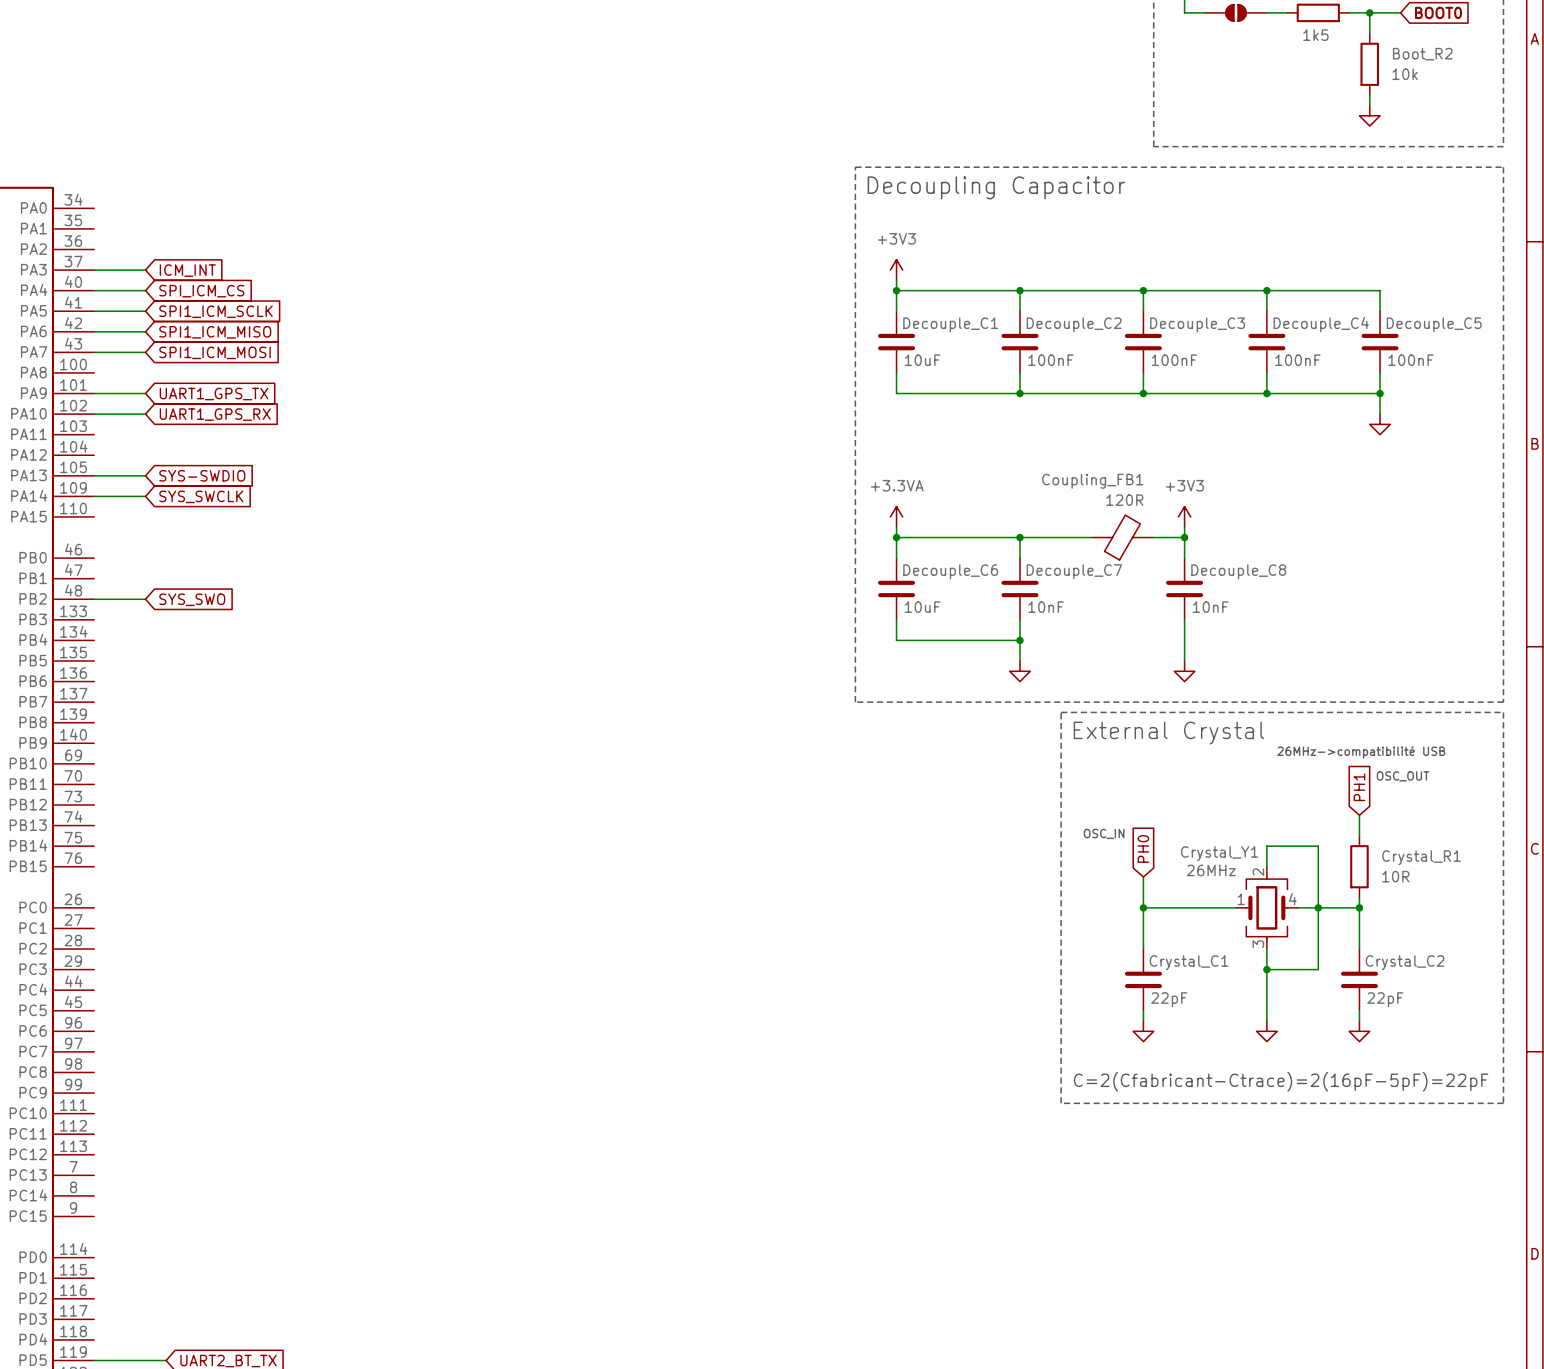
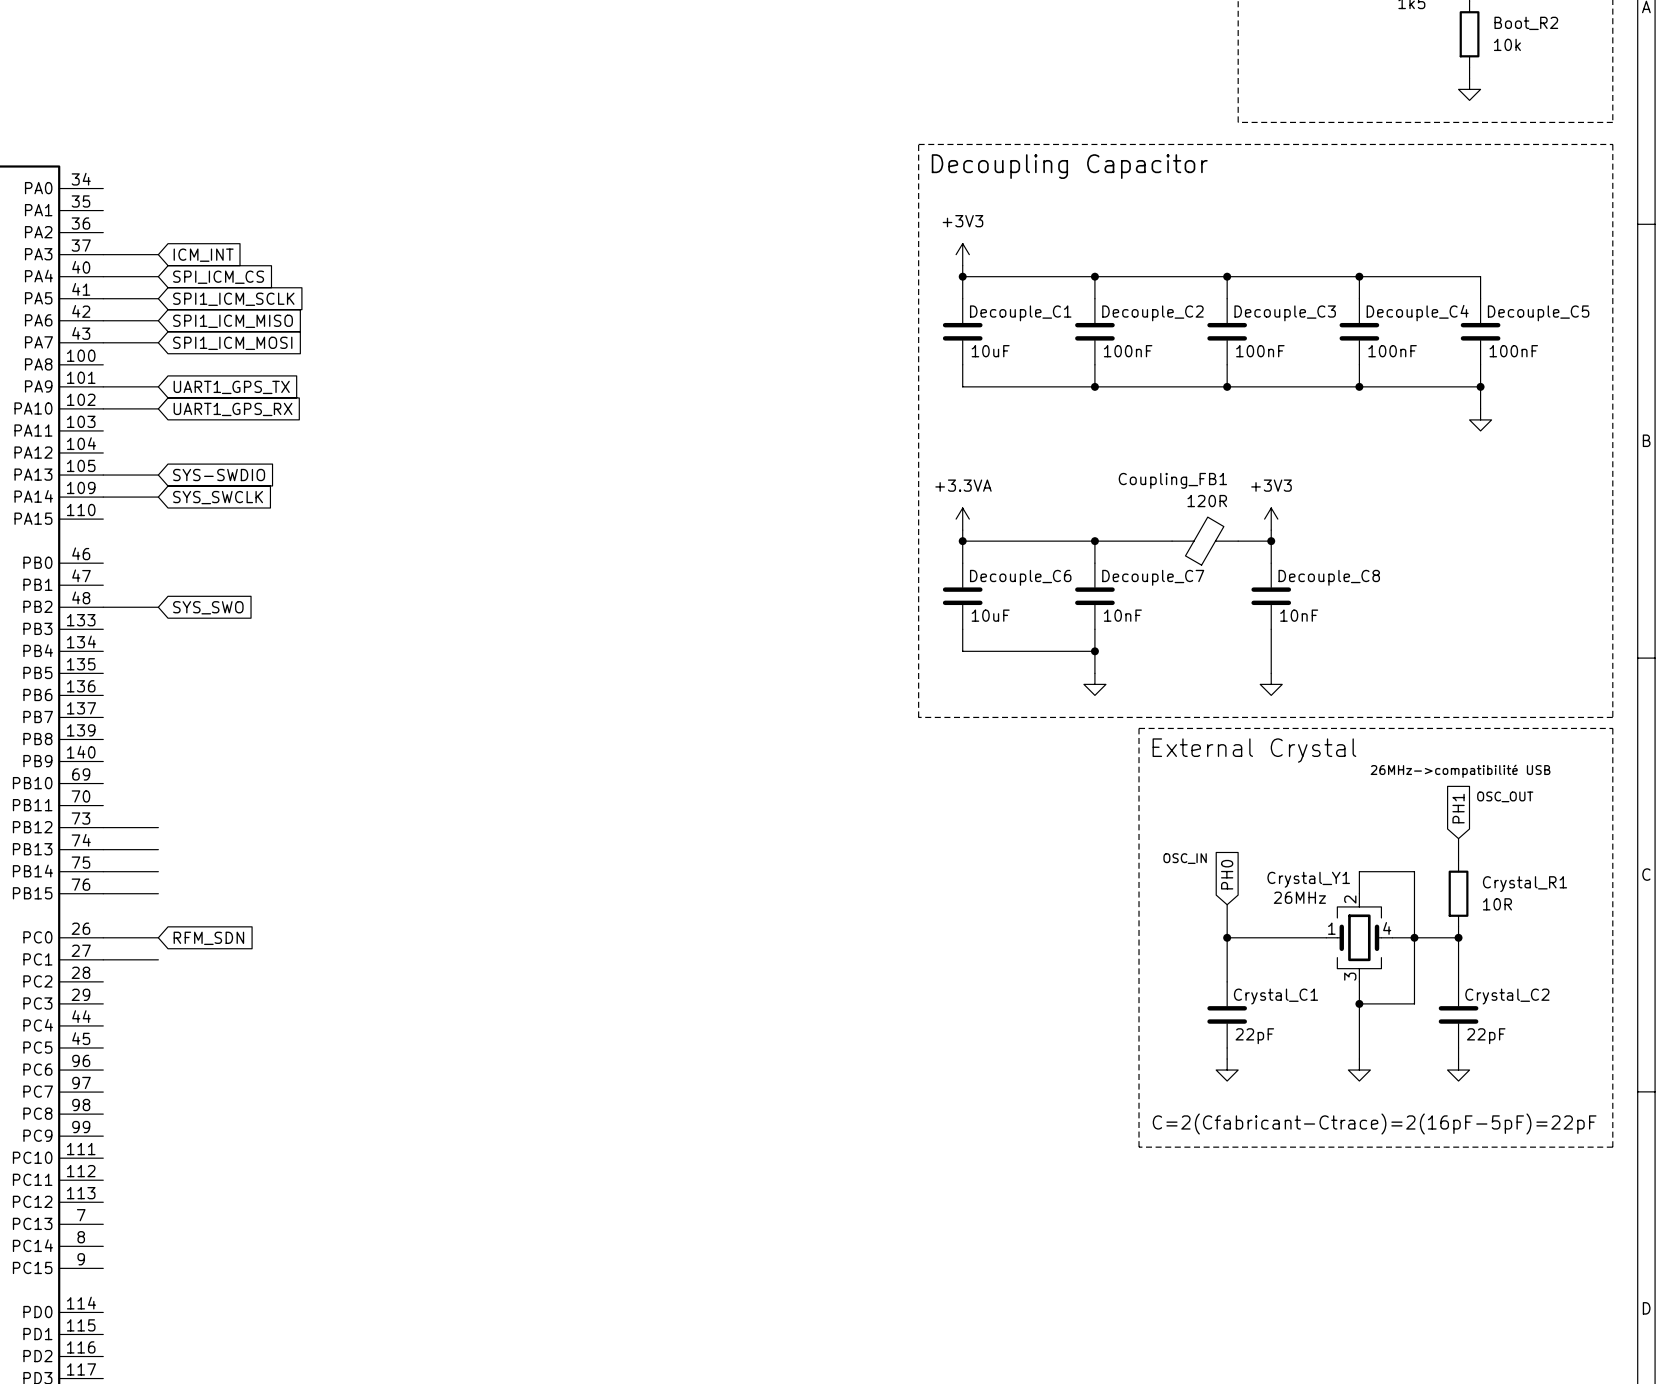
wire: none -> (103, 827) (158, 827)
wire: none -> (103, 849) (158, 849)
wire: none -> (103, 871) (158, 871)
wire: none -> (103, 893) (158, 893)
wire: none -> (103, 937) (158, 937)
global label: none -> RFM_SDN (208, 938)
wire: none -> (103, 959) (158, 959)

